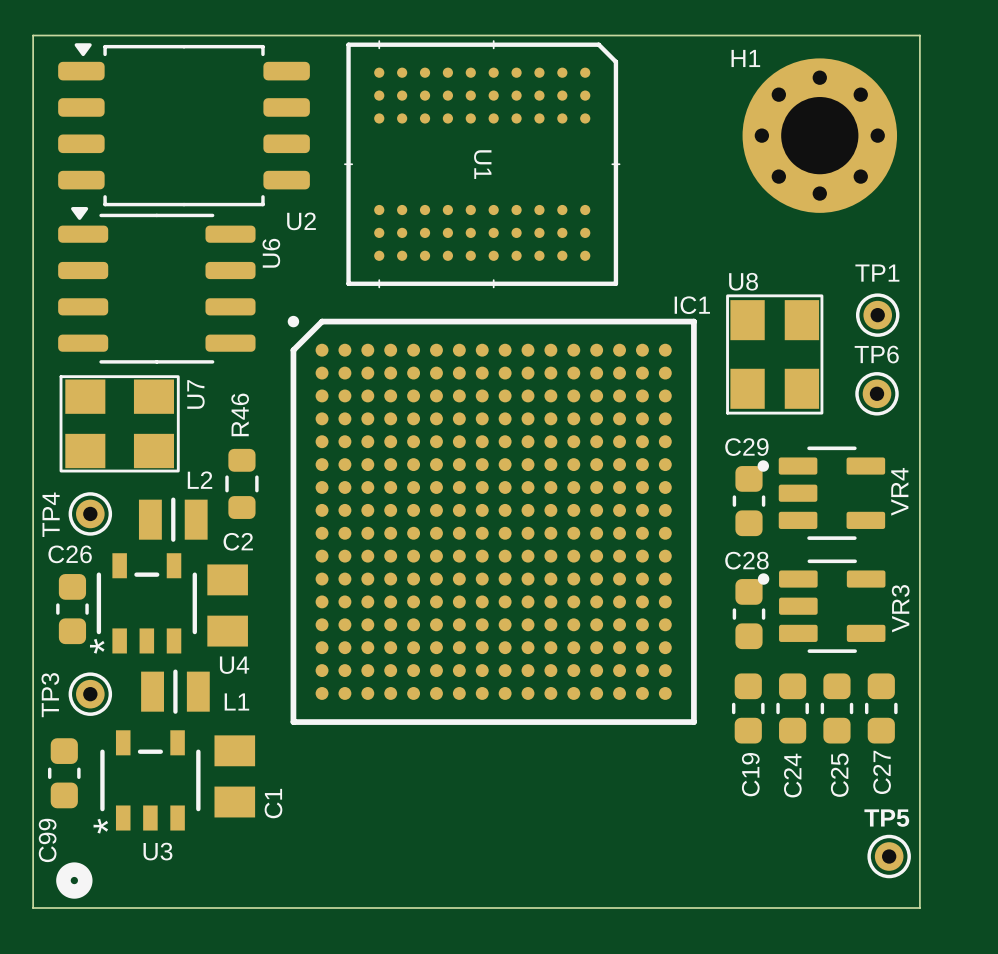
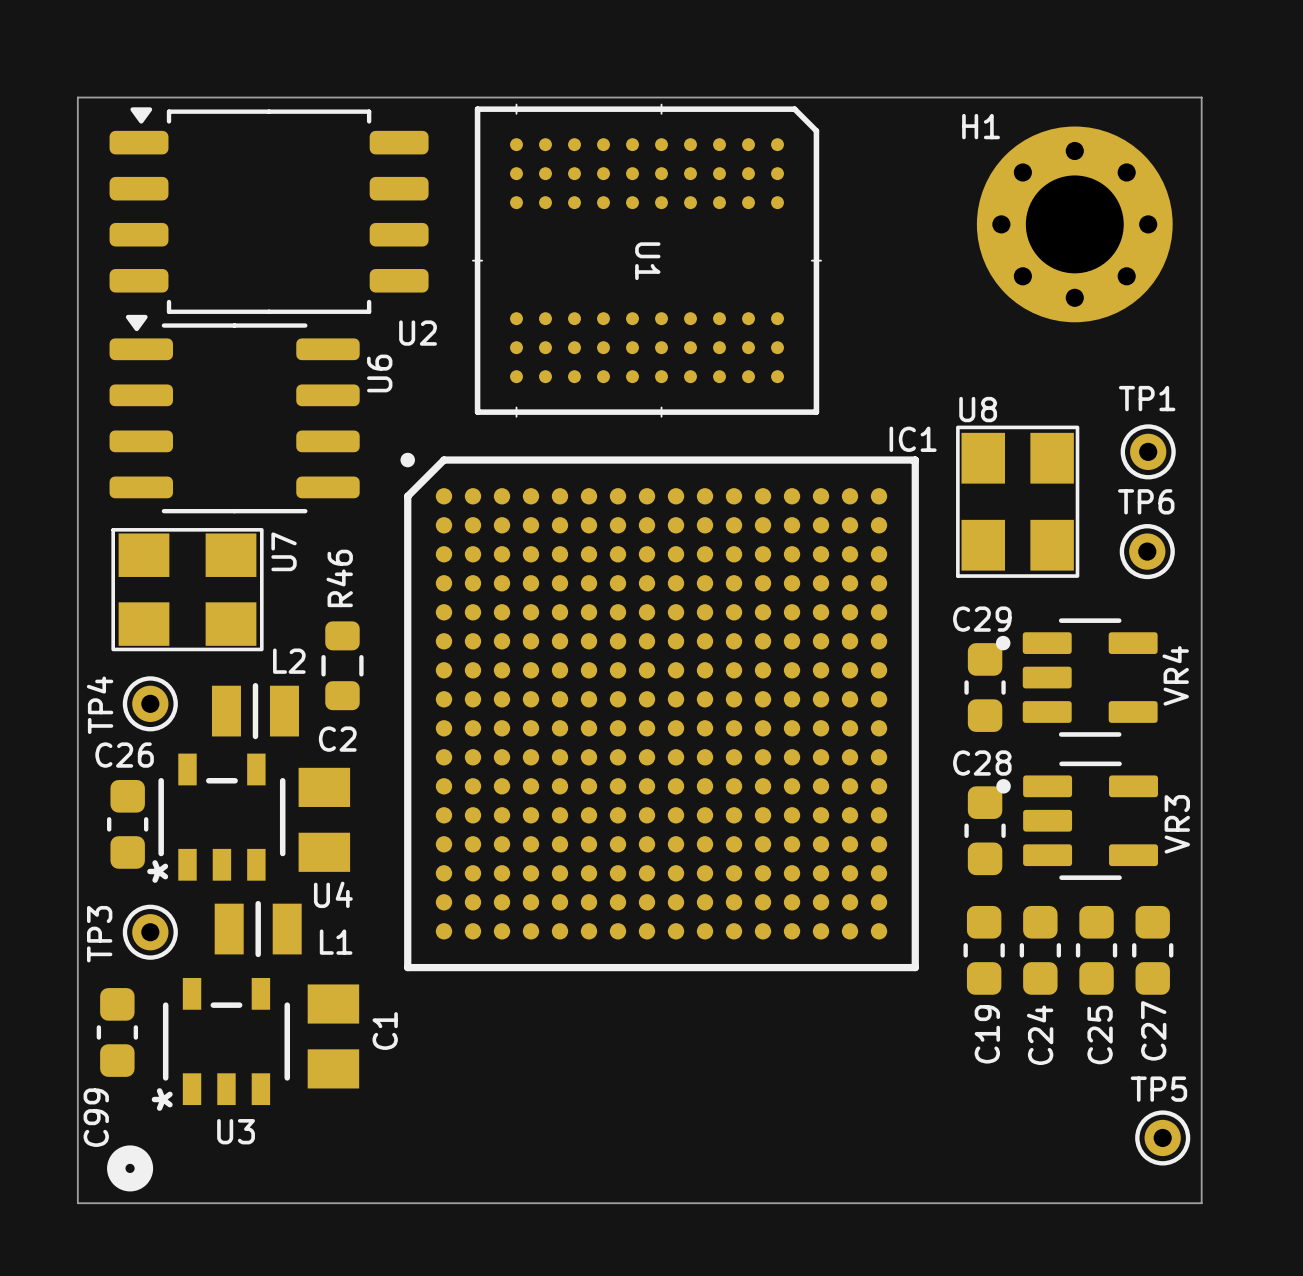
C1 name position: C1 (273, 803) -> C1 (385, 1031)

